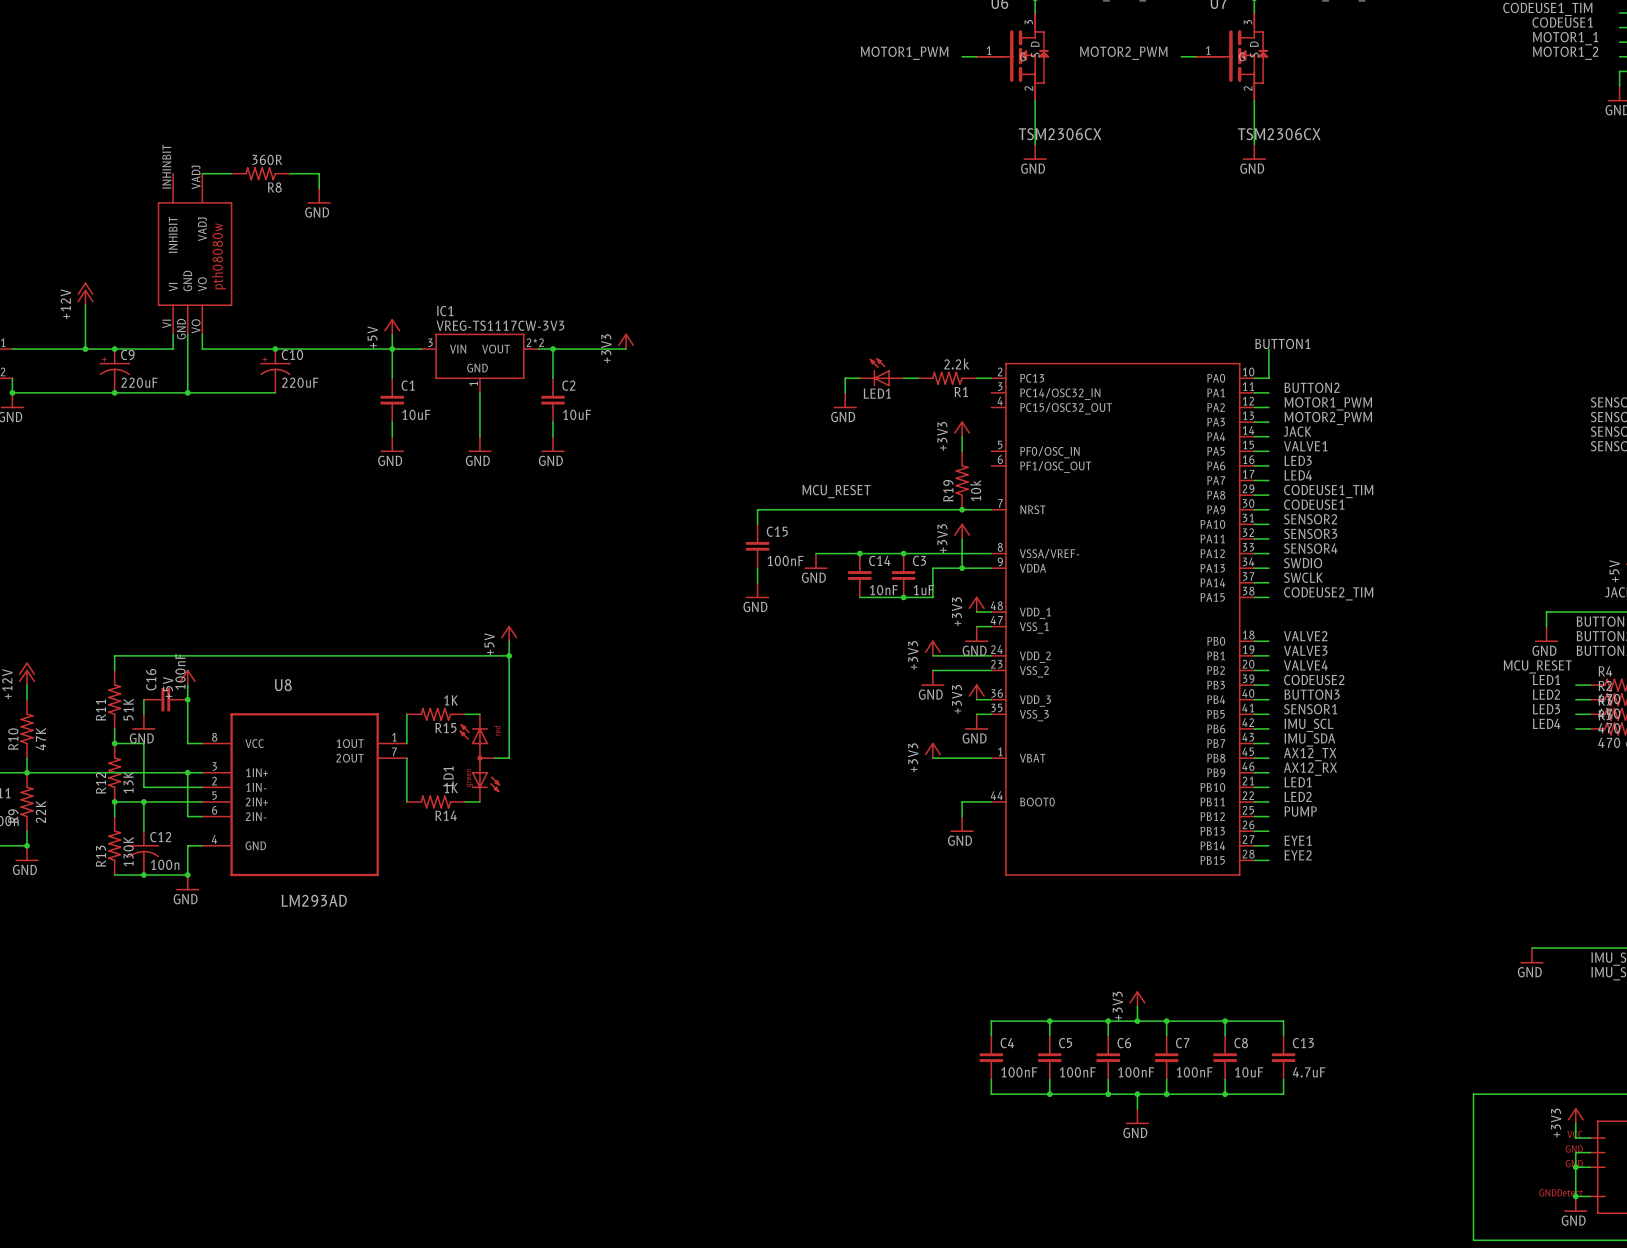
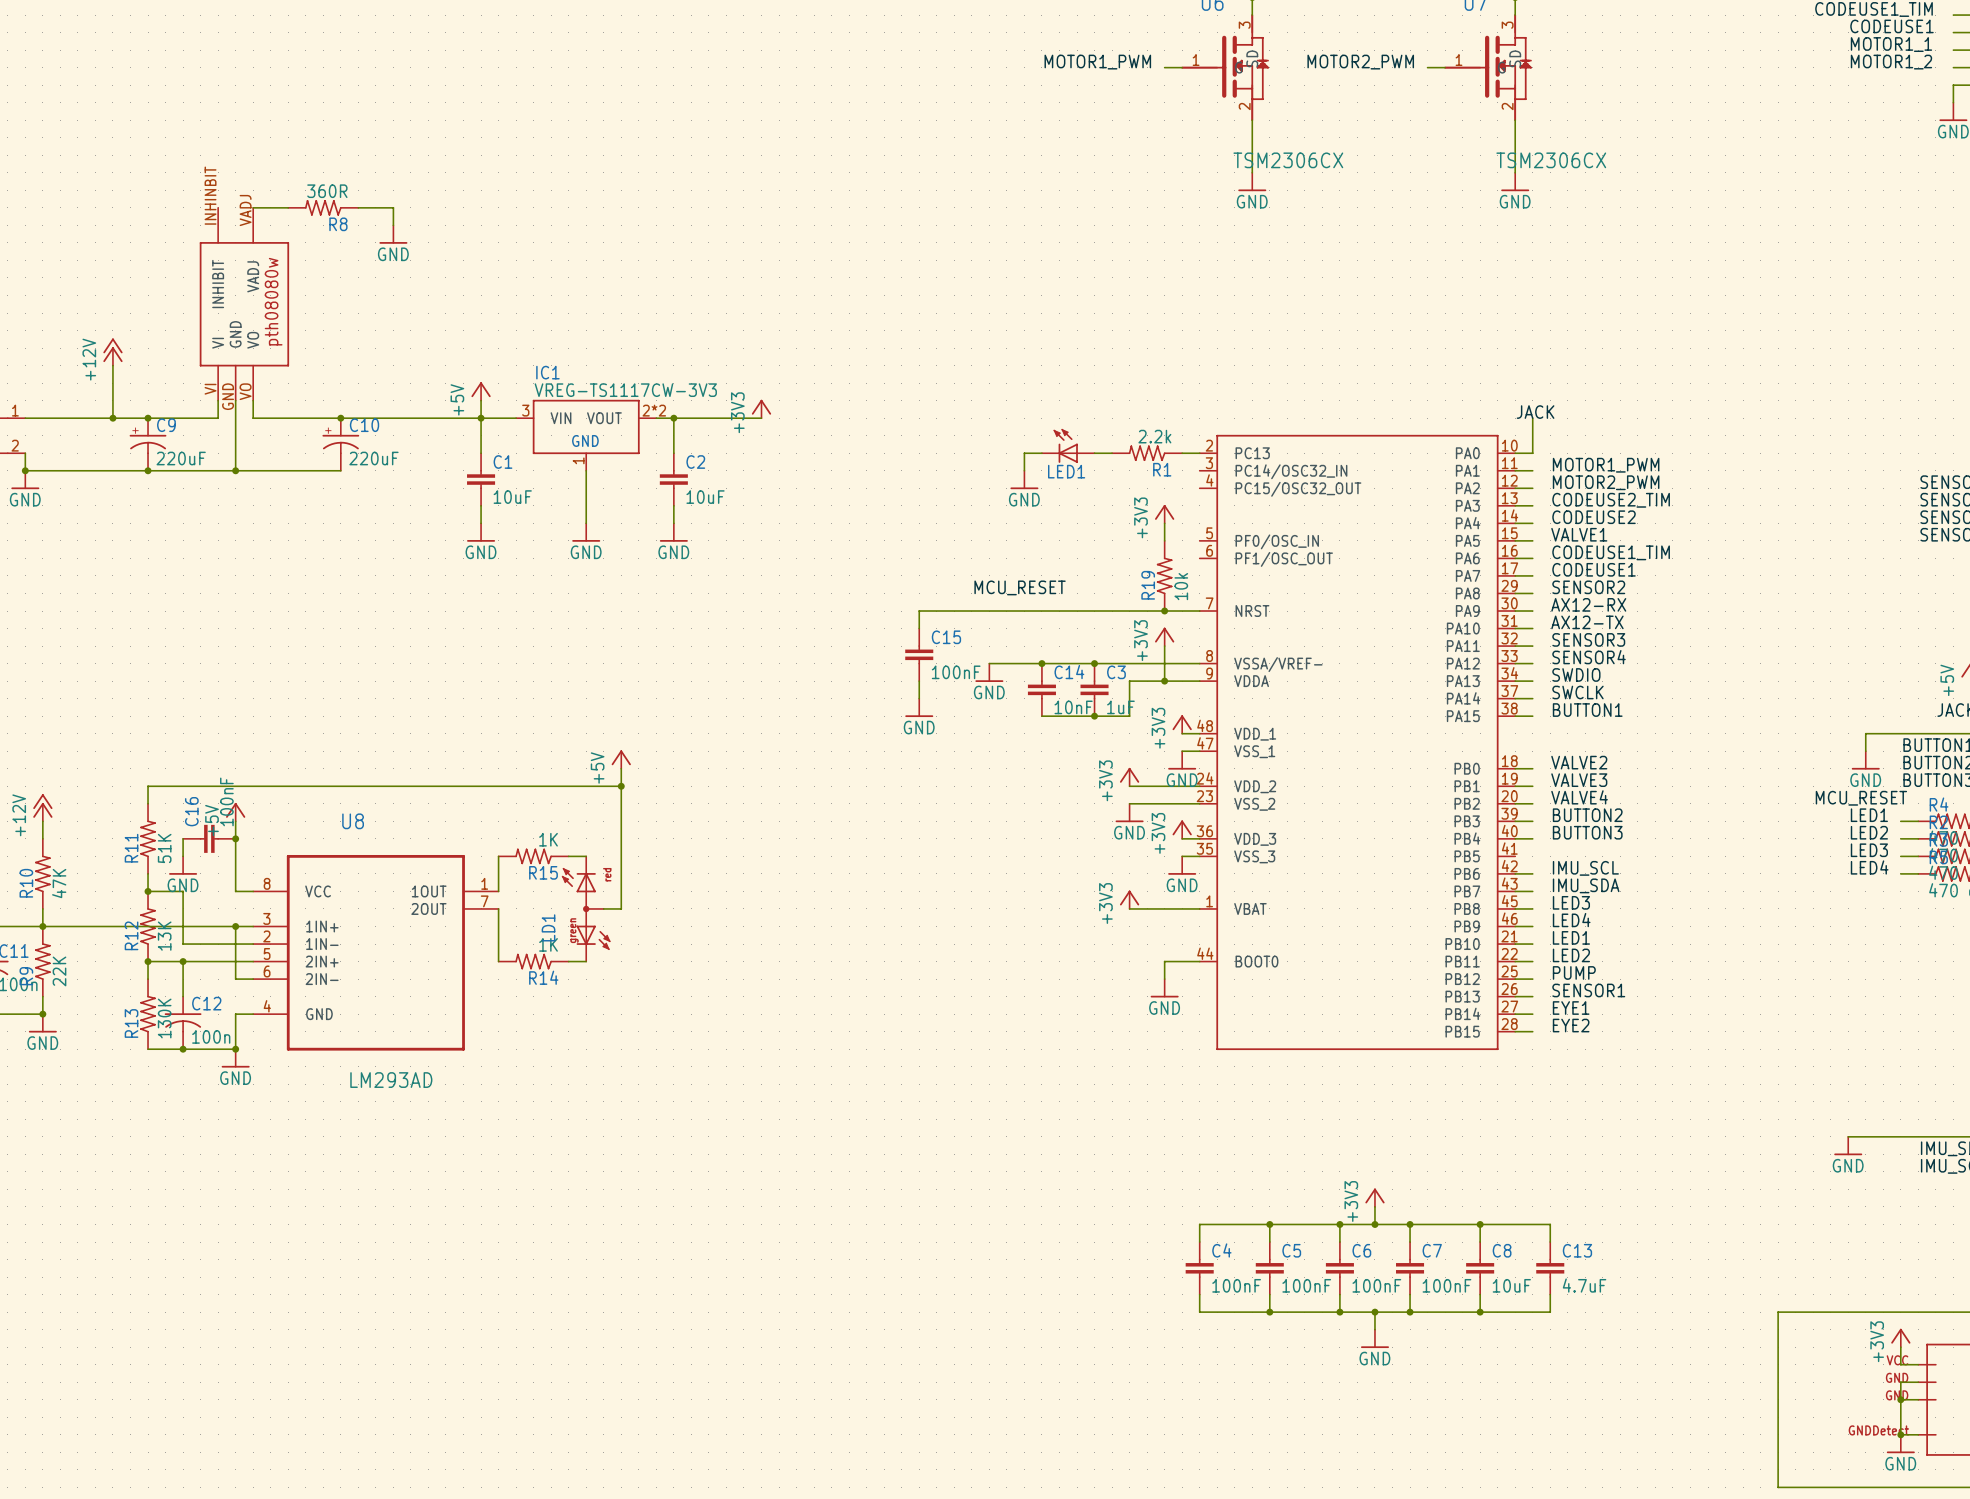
label: BUTTON1 (1282, 343) -> JACK (1535, 412)
label: BUTTON2 (1312, 387) -> MOTOR1_PWM (1606, 465)
label: MOTOR1_PWM (1328, 403) -> MOTOR2_PWM (1606, 482)
label: MOTOR2_PWM (1328, 418) -> CODEUSE2_TIM (1611, 500)
label: JACK (1297, 431) -> CODEUSE2 (1594, 517)
label: LED3 (1298, 460) -> CODEUSE1_TIM (1611, 552)
label: LED4 (1298, 475) -> CODEUSE1 (1594, 569)
label: CODEUSE1_TIM (1328, 491) -> SENSOR2 (1588, 587)
label: CODEUSE1 (1314, 504) -> AX12-RX (1588, 604)
label: SENSOR2 (1310, 519) -> AX12-TX (1587, 622)
label: CODEUSE2_TIM (1328, 593) -> BUTTON1 (1587, 710)
label: CODEUSE2 (1314, 680) -> BUTTON2 (1587, 815)
label position: SENSOR1 (1310, 709) -> SENSOR1 (1588, 990)
wire: (1254, 714) (1268, 714) -> none
label: AX12_TX (1310, 754) -> LED3 (1571, 902)
label: AX12_RX (1310, 769) -> LED4 (1571, 920)

